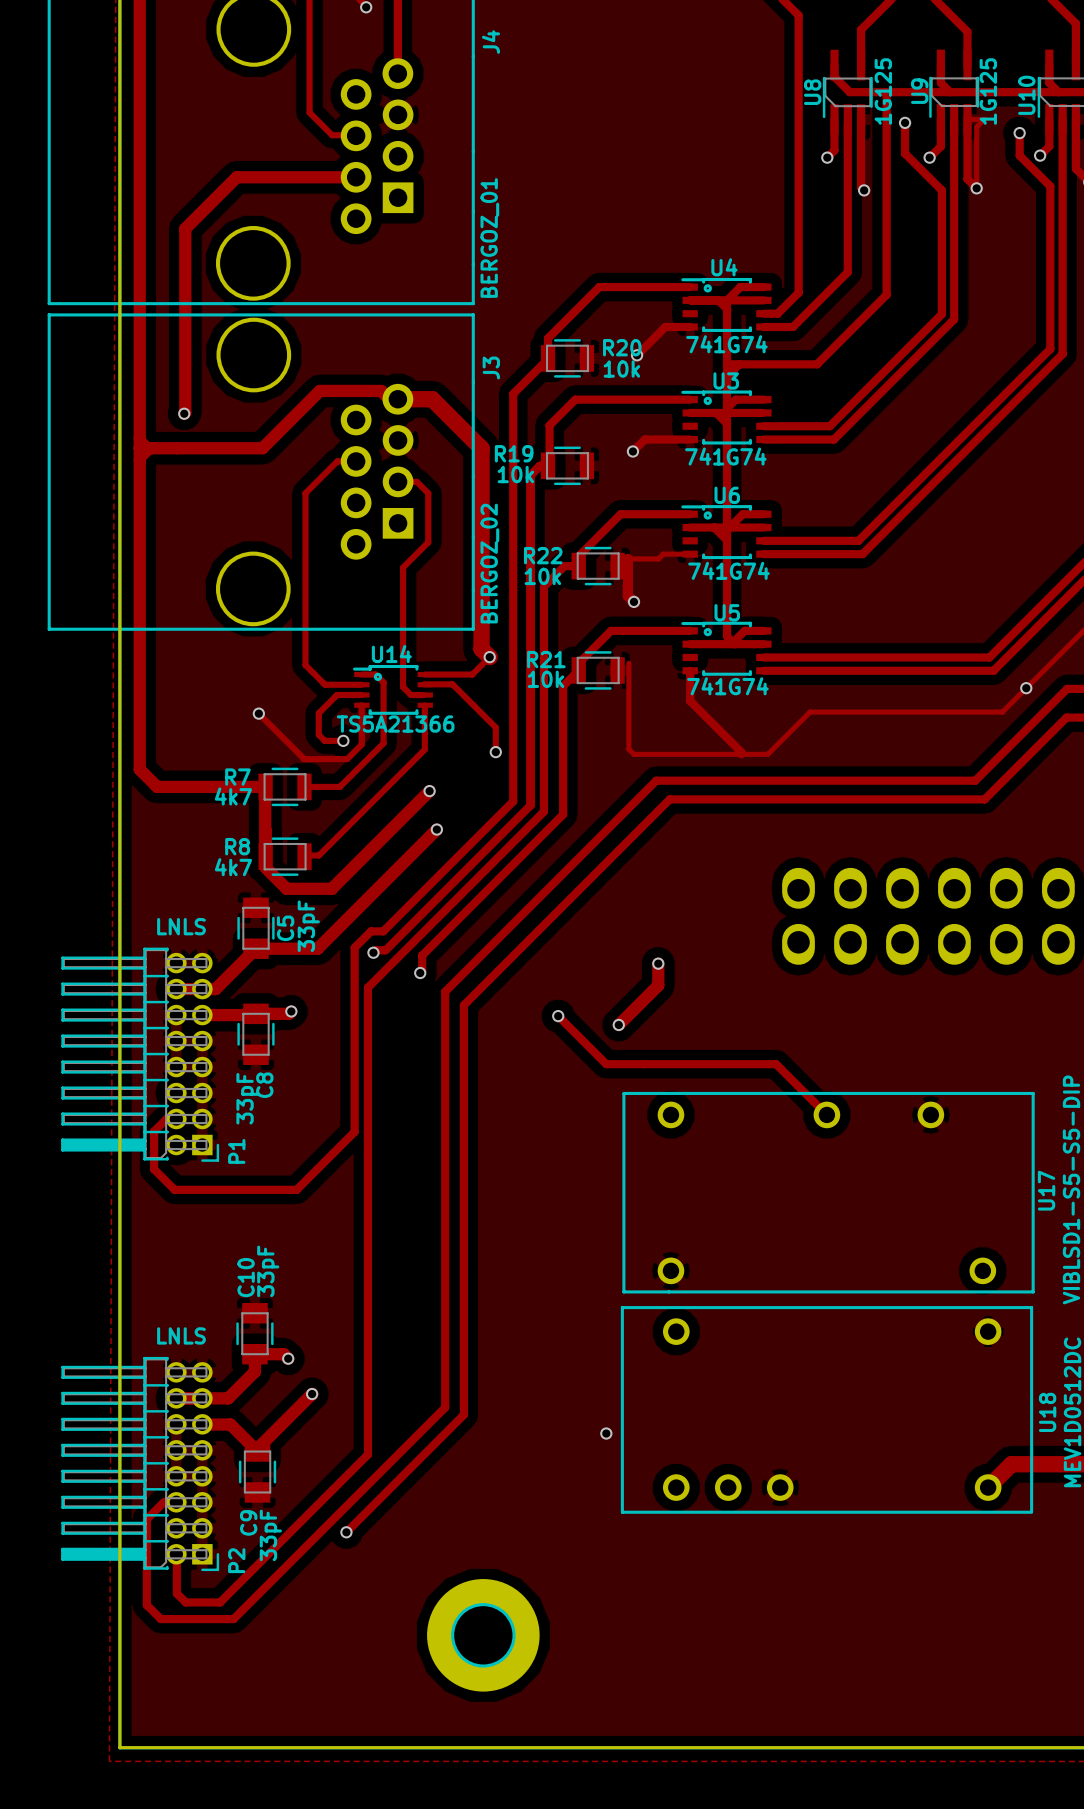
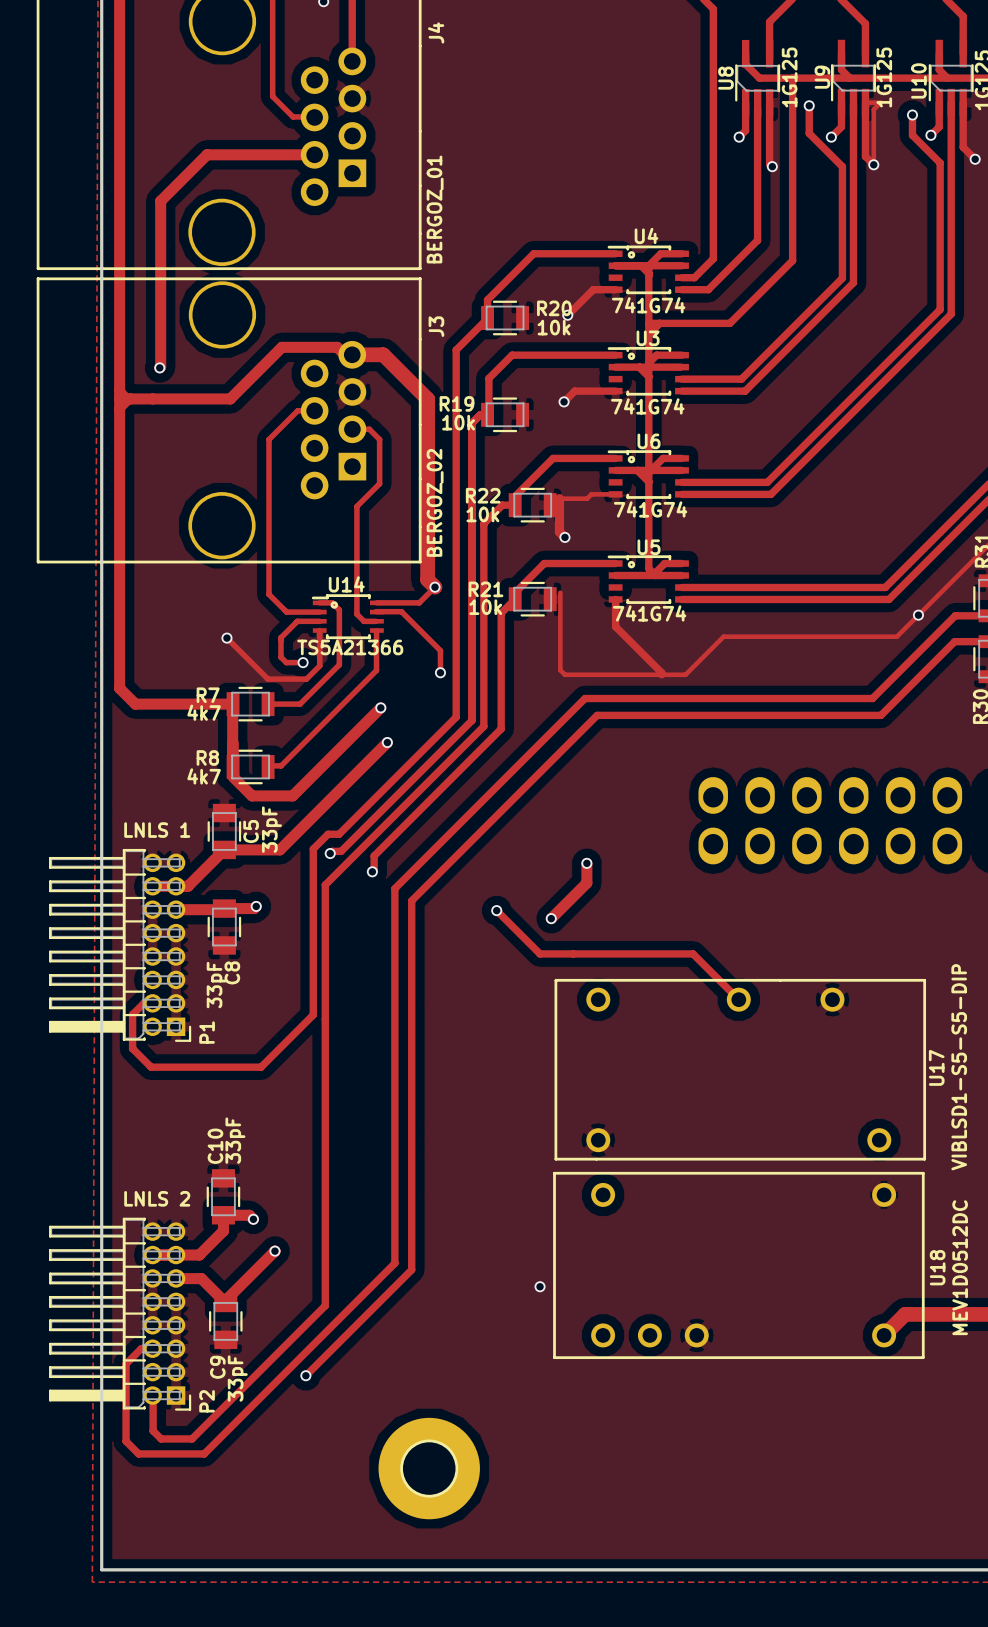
P1 value: LNLS (181, 926) -> LNLS 1 (157, 830)
P2 value: LNLS (181, 1335) -> LNLS 2 (157, 1198)

